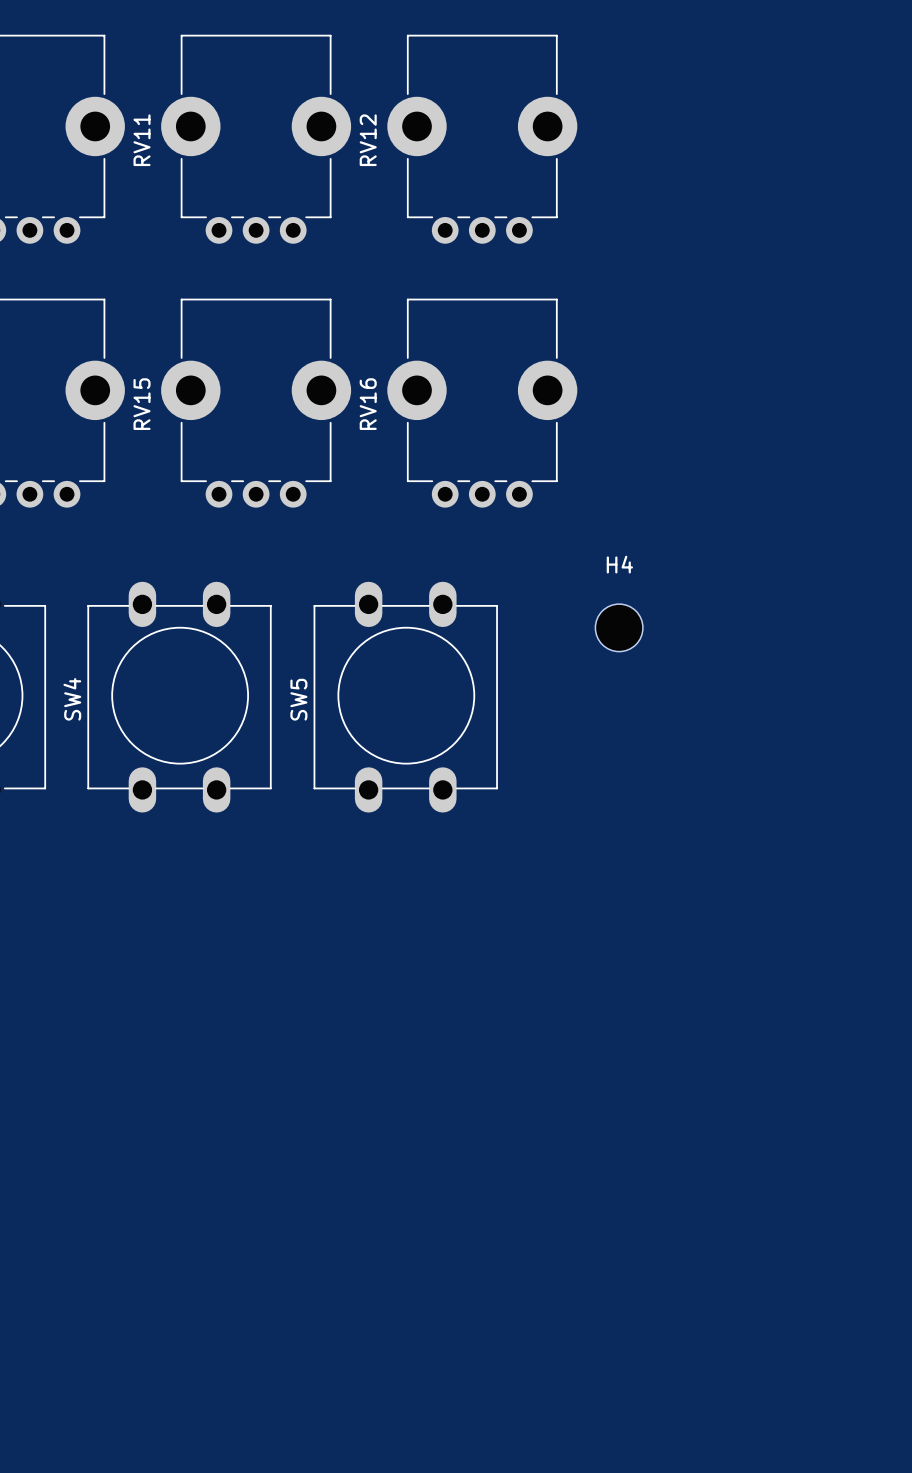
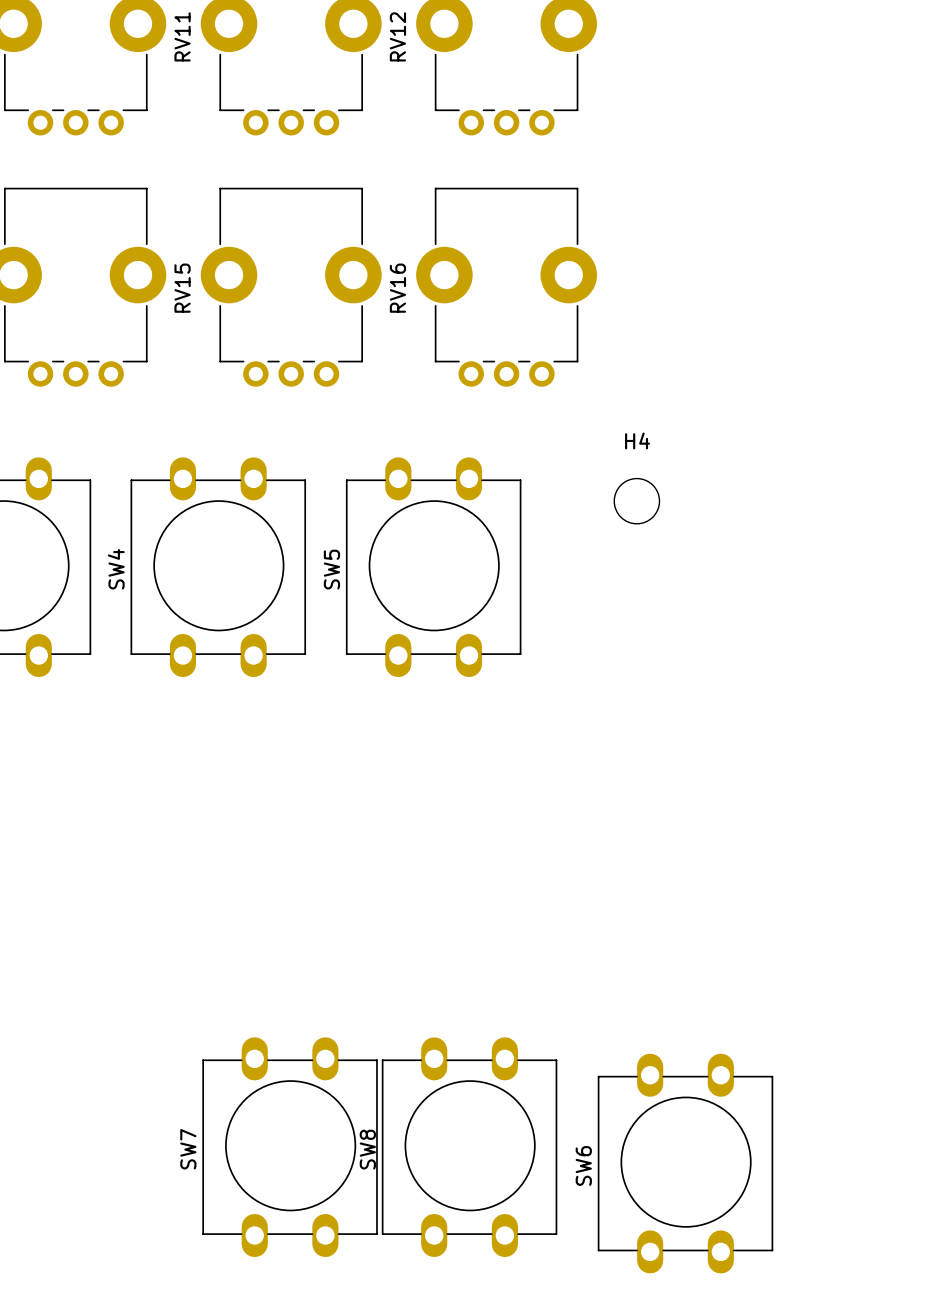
SW7: none -> (290, 1147)
SW8: none -> (469, 1147)
SW6: none -> (685, 1163)

